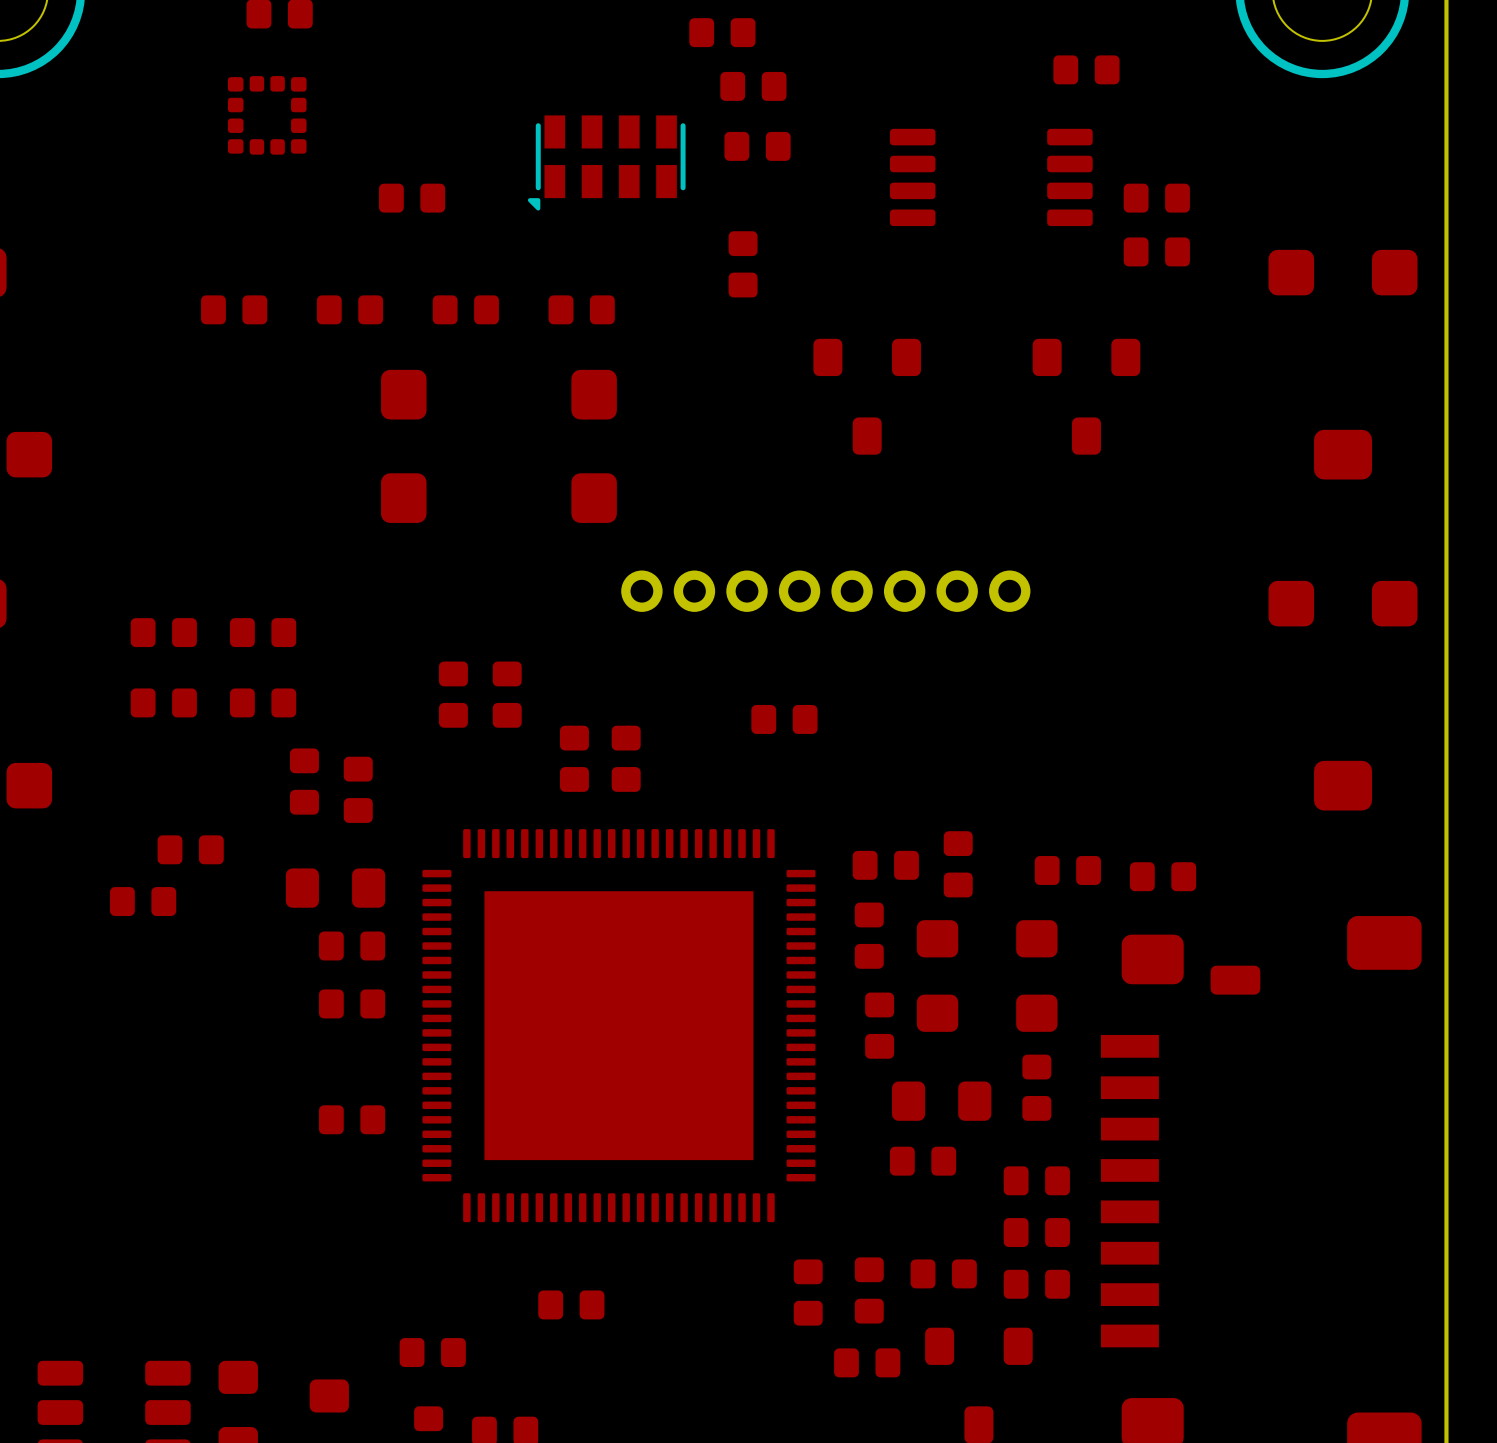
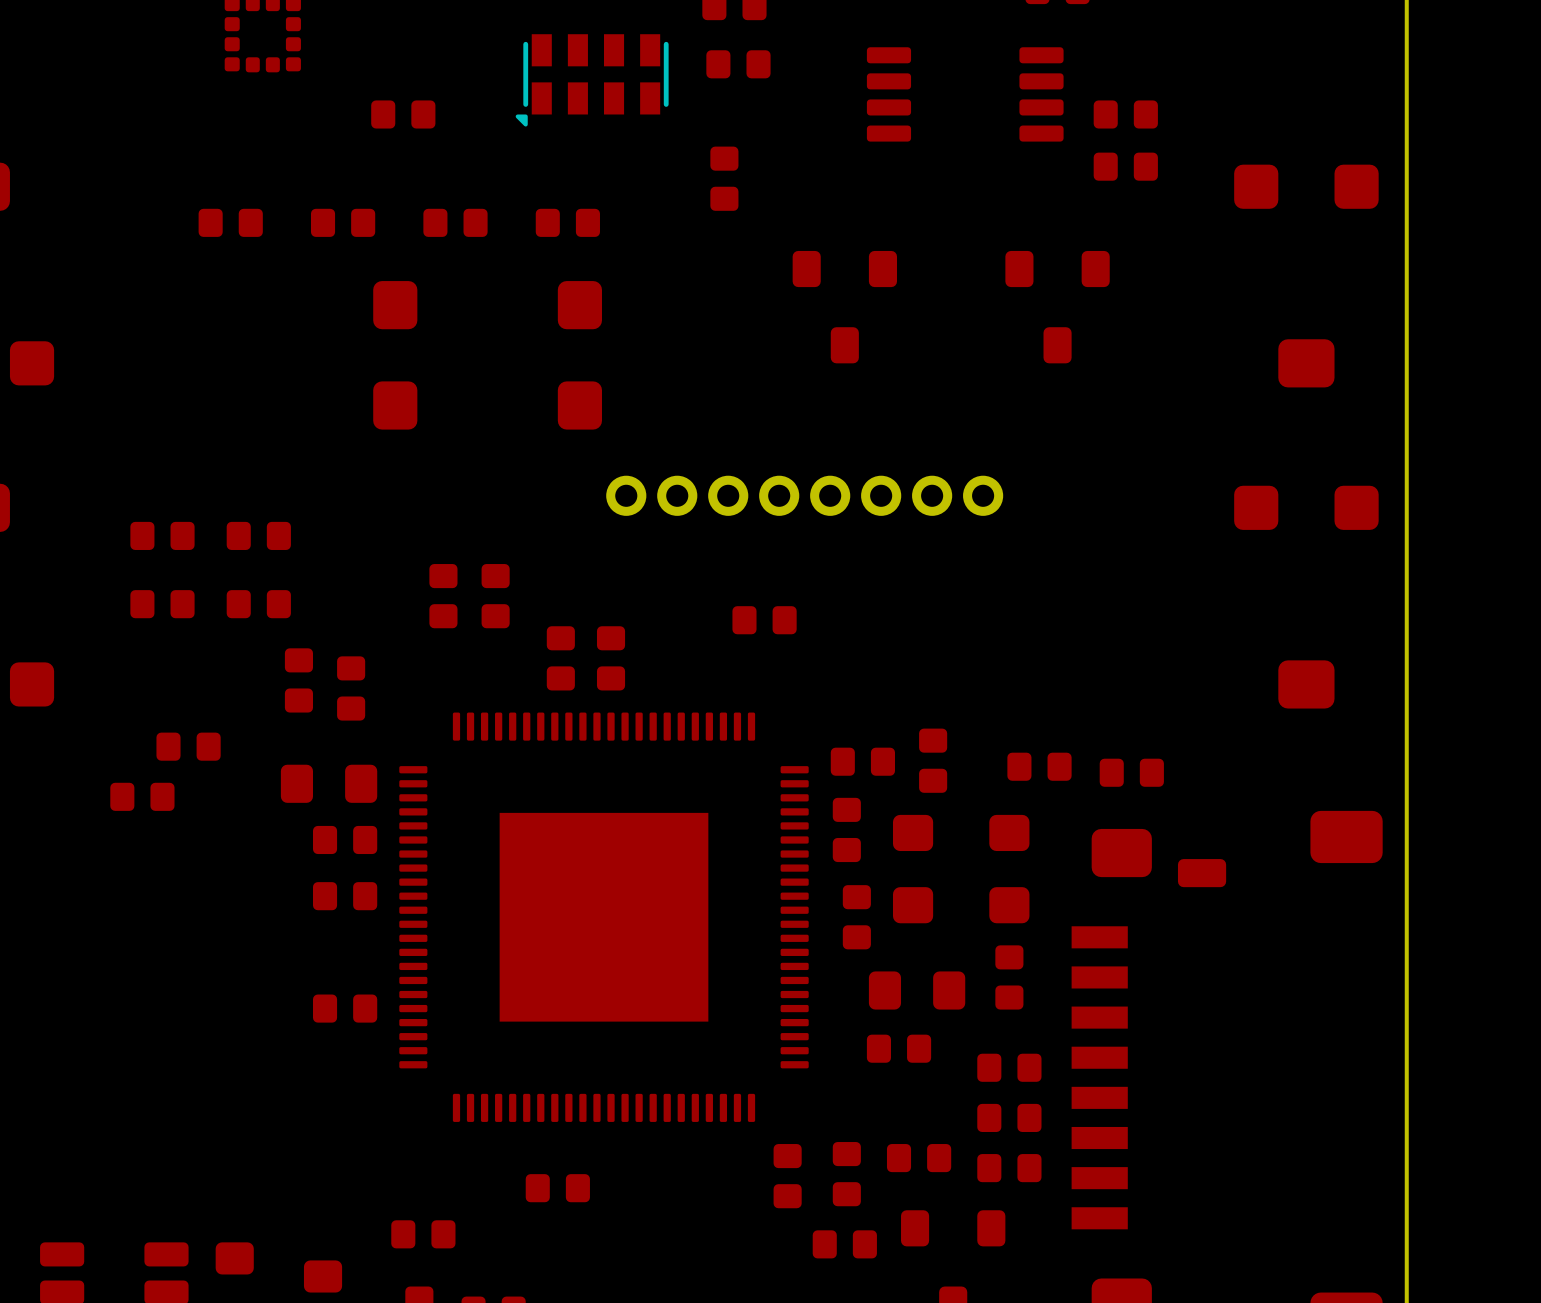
part footprint: [422, 829, 816, 1223] -> [399, 712, 809, 1122]

